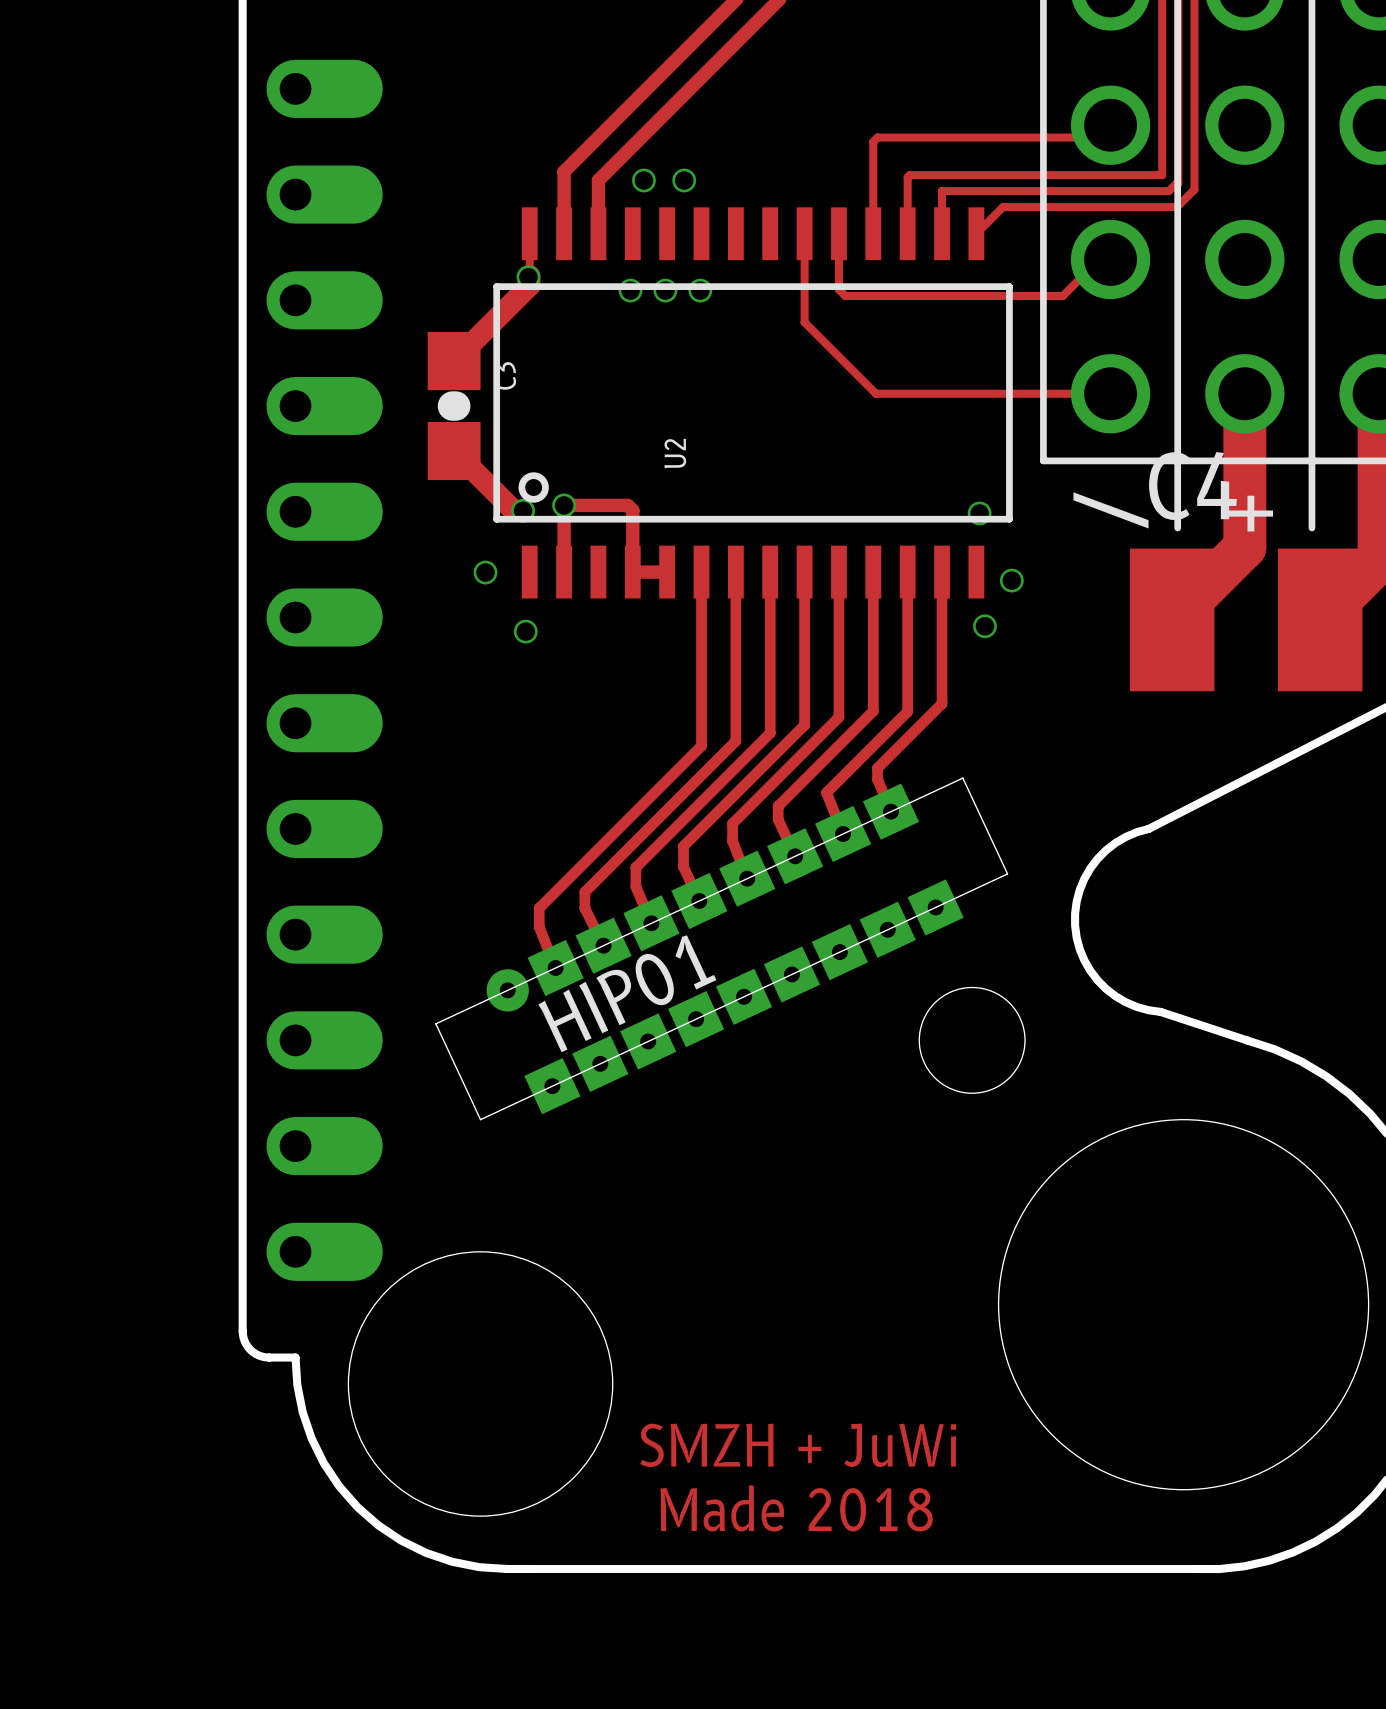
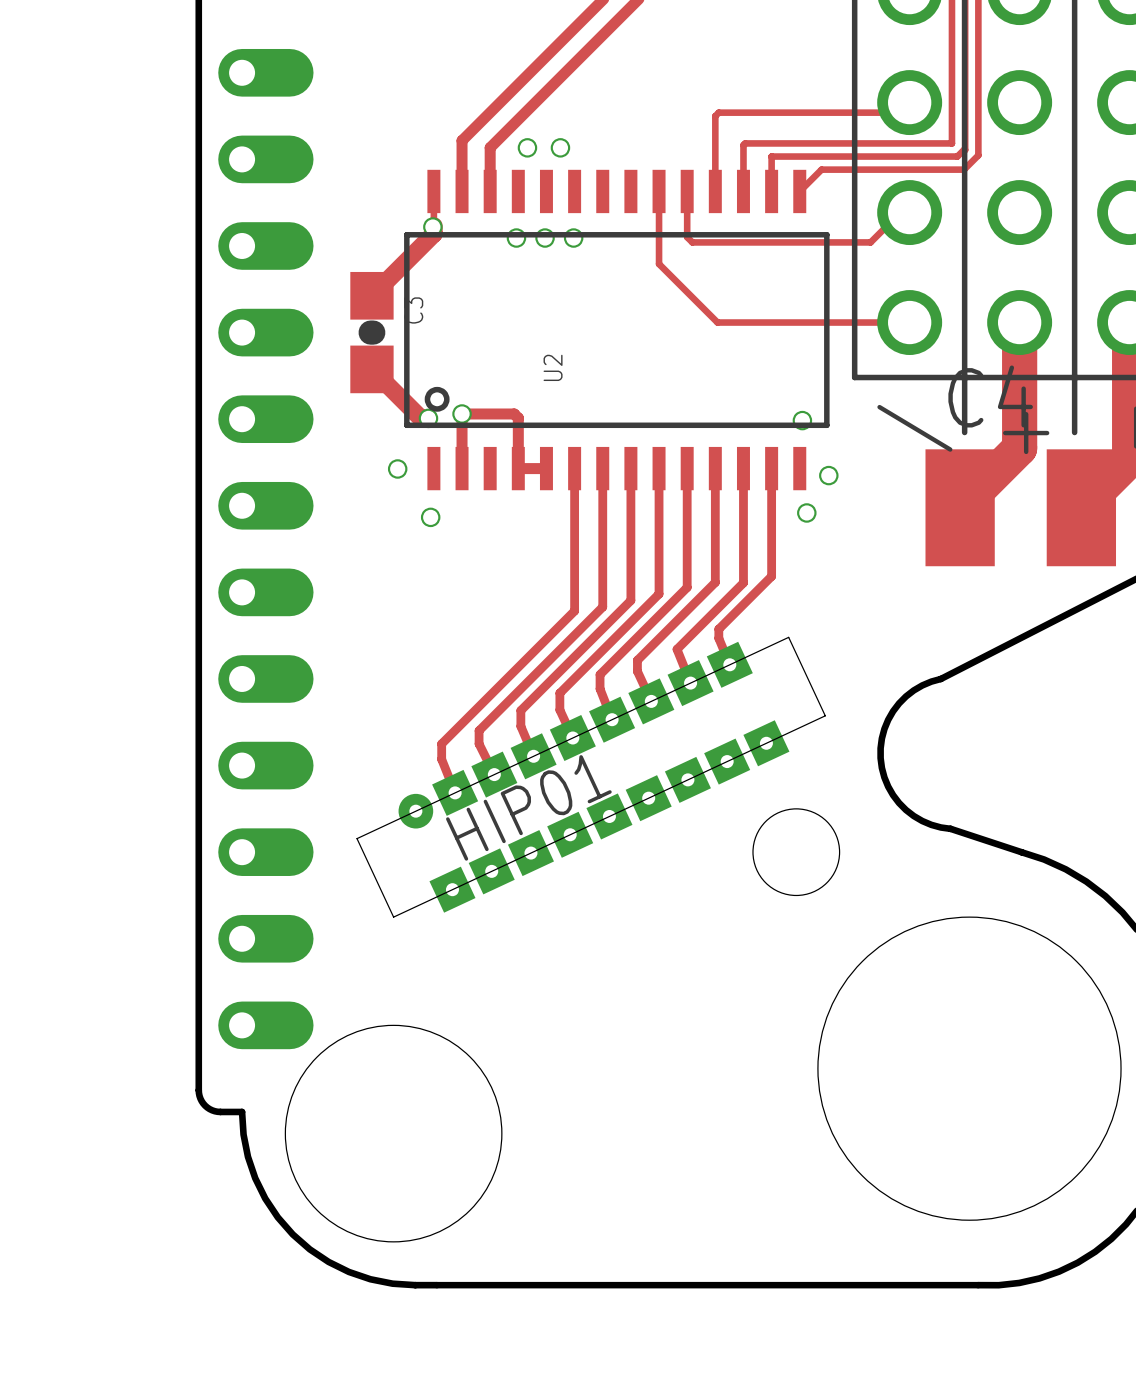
text: SMZH + JuWi (798, 1445) -> none
text: Made 2018 (796, 1508) -> none

